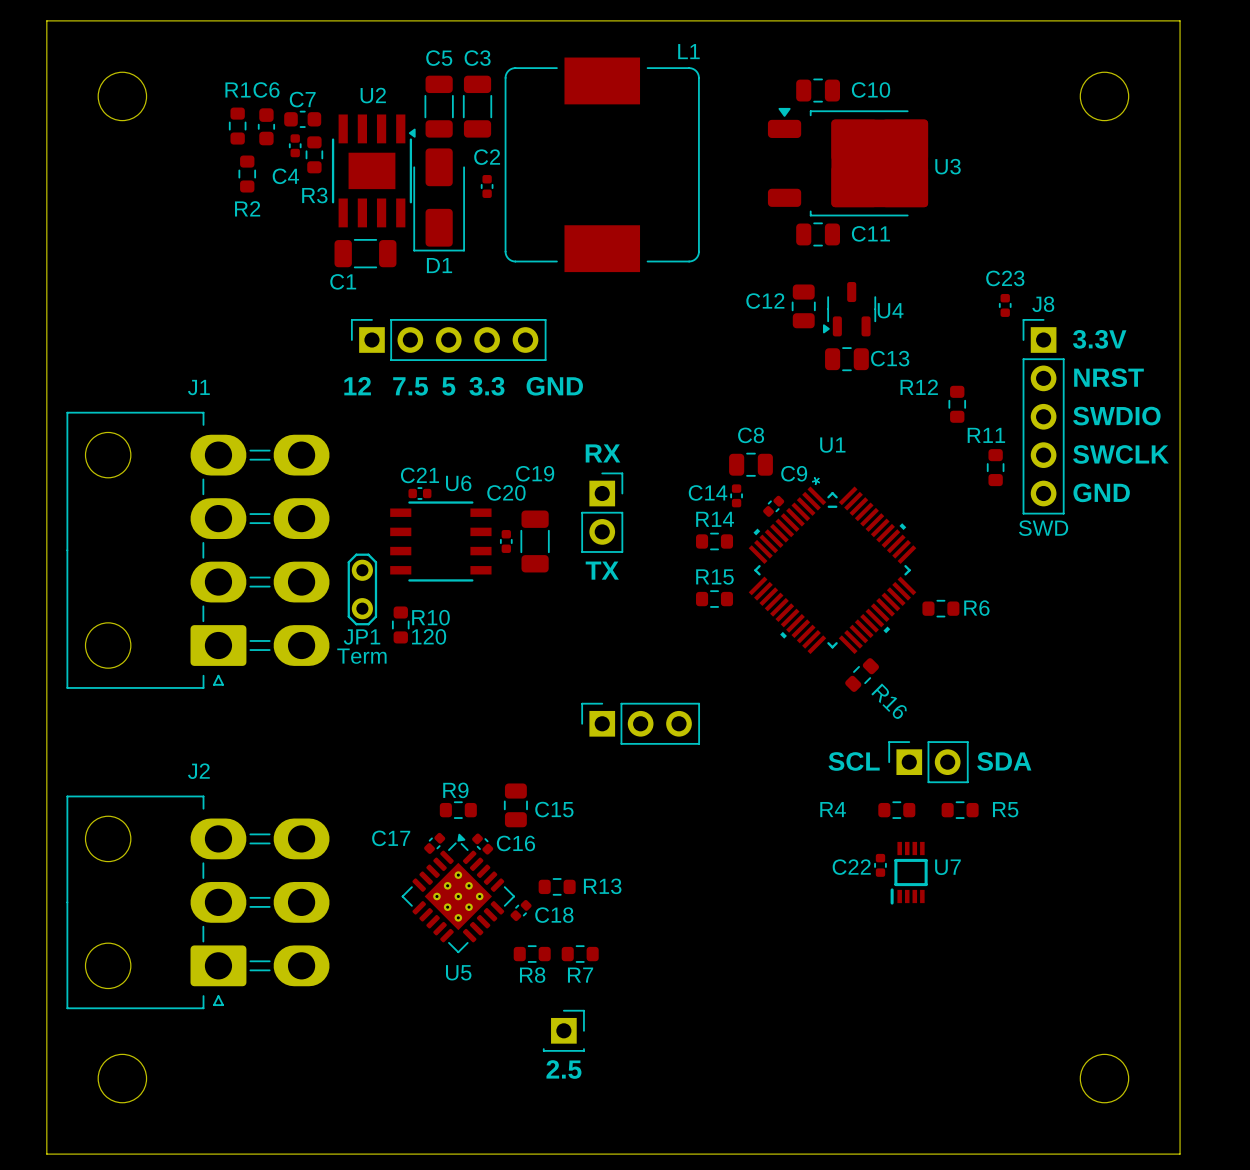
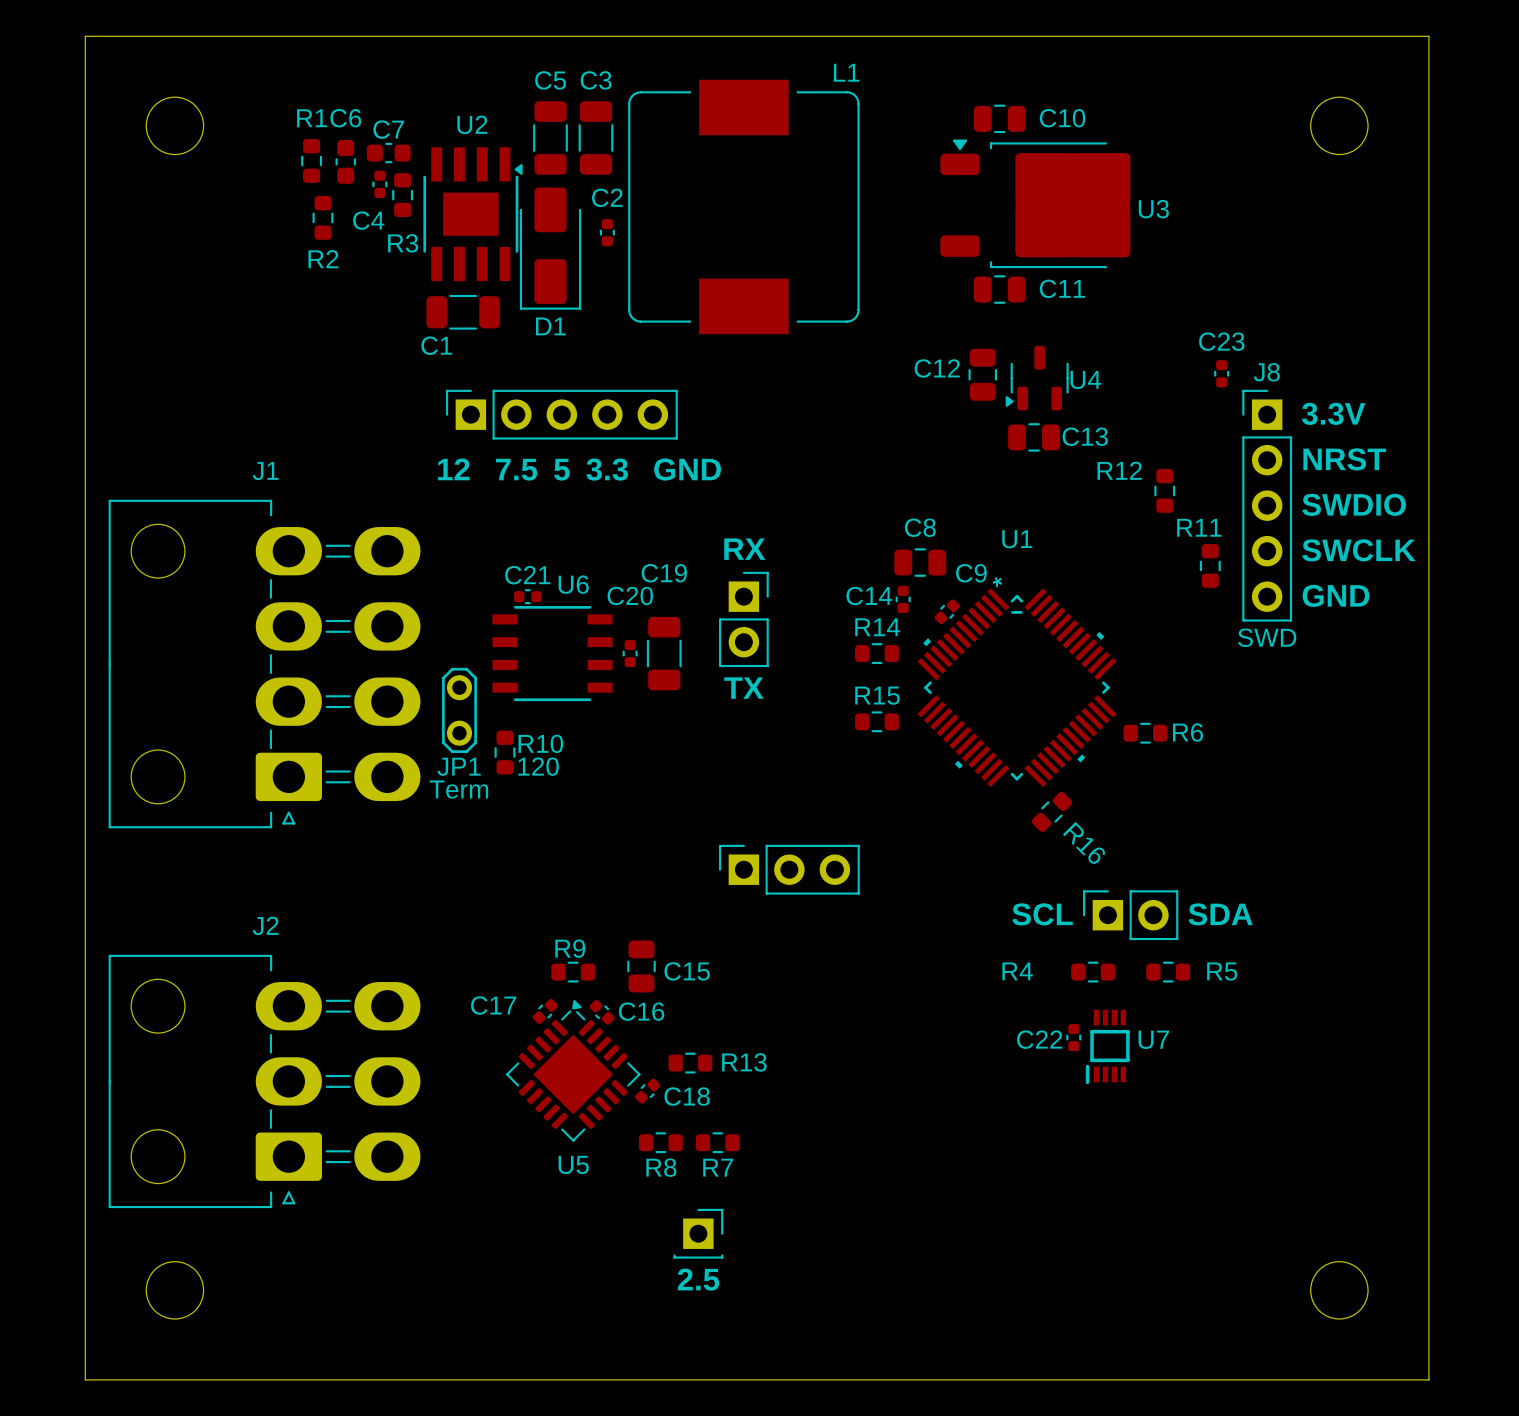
U5 footprint: [401, 833, 516, 954] -> [506, 1000, 641, 1142]

